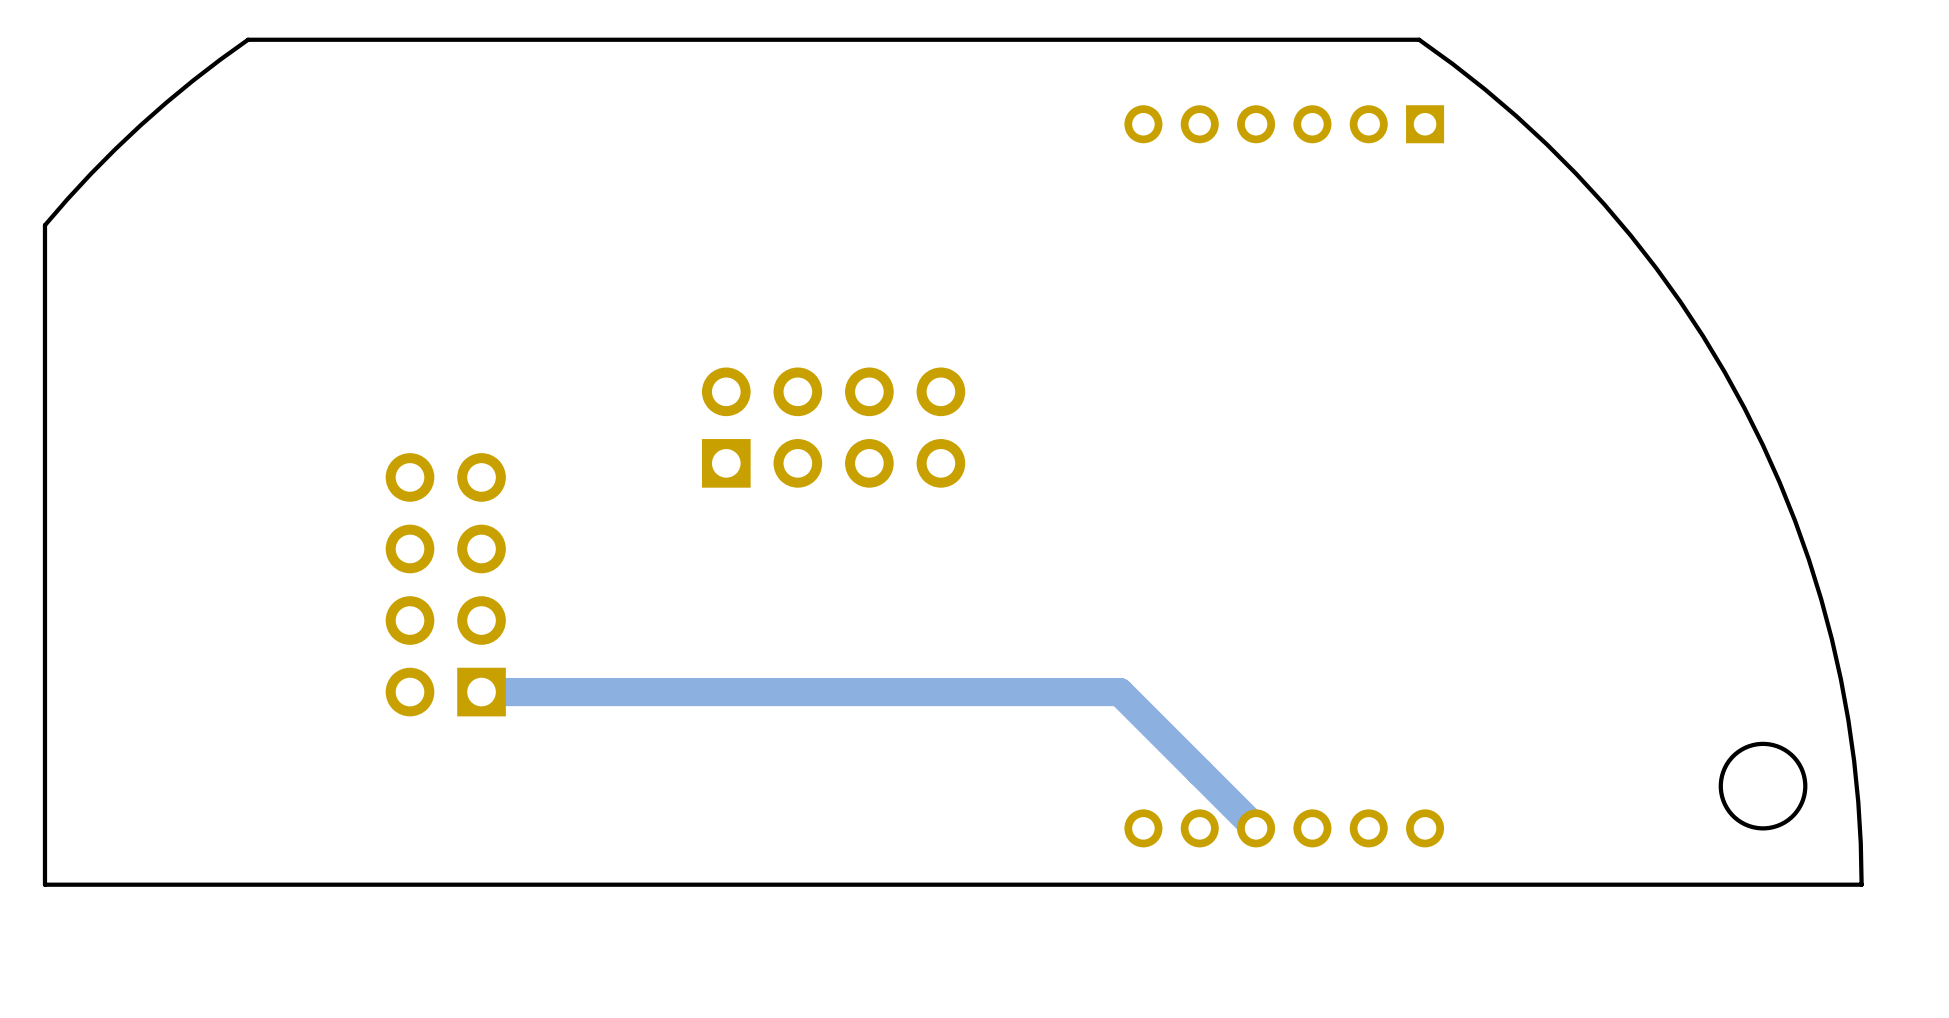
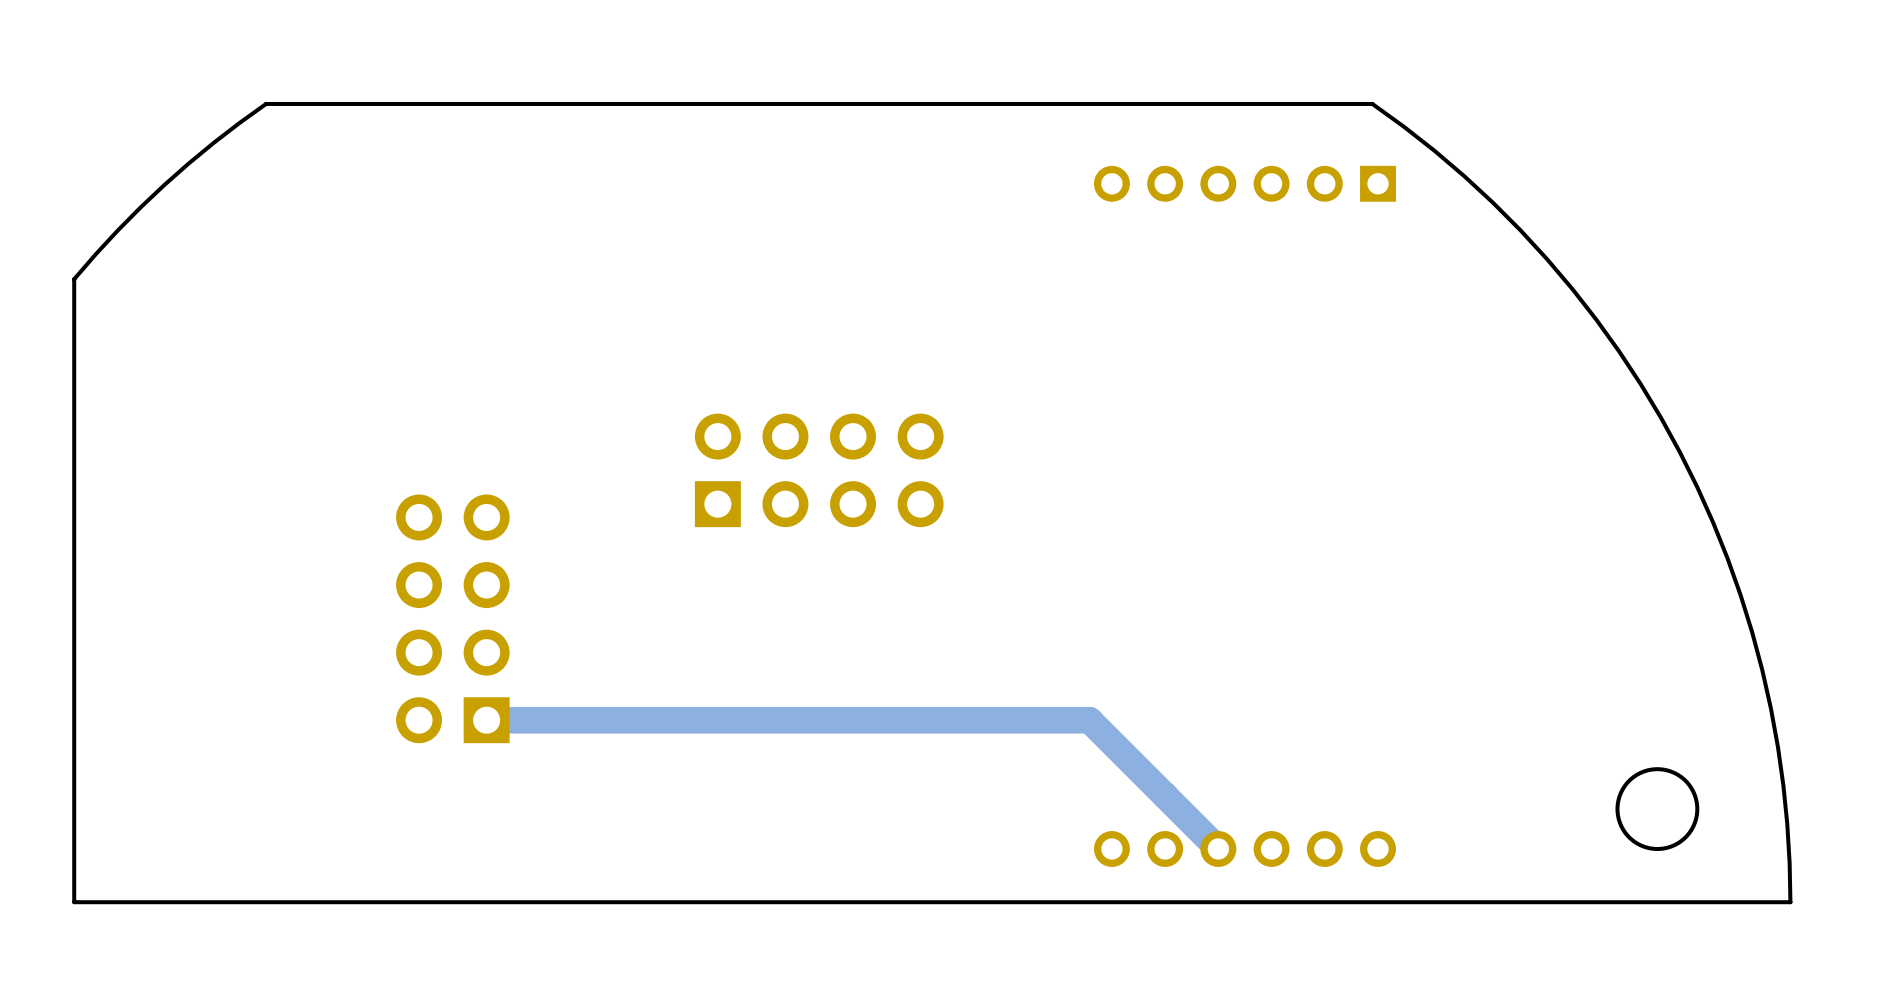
round board edge position: (1763, 786) -> (1657, 809)

